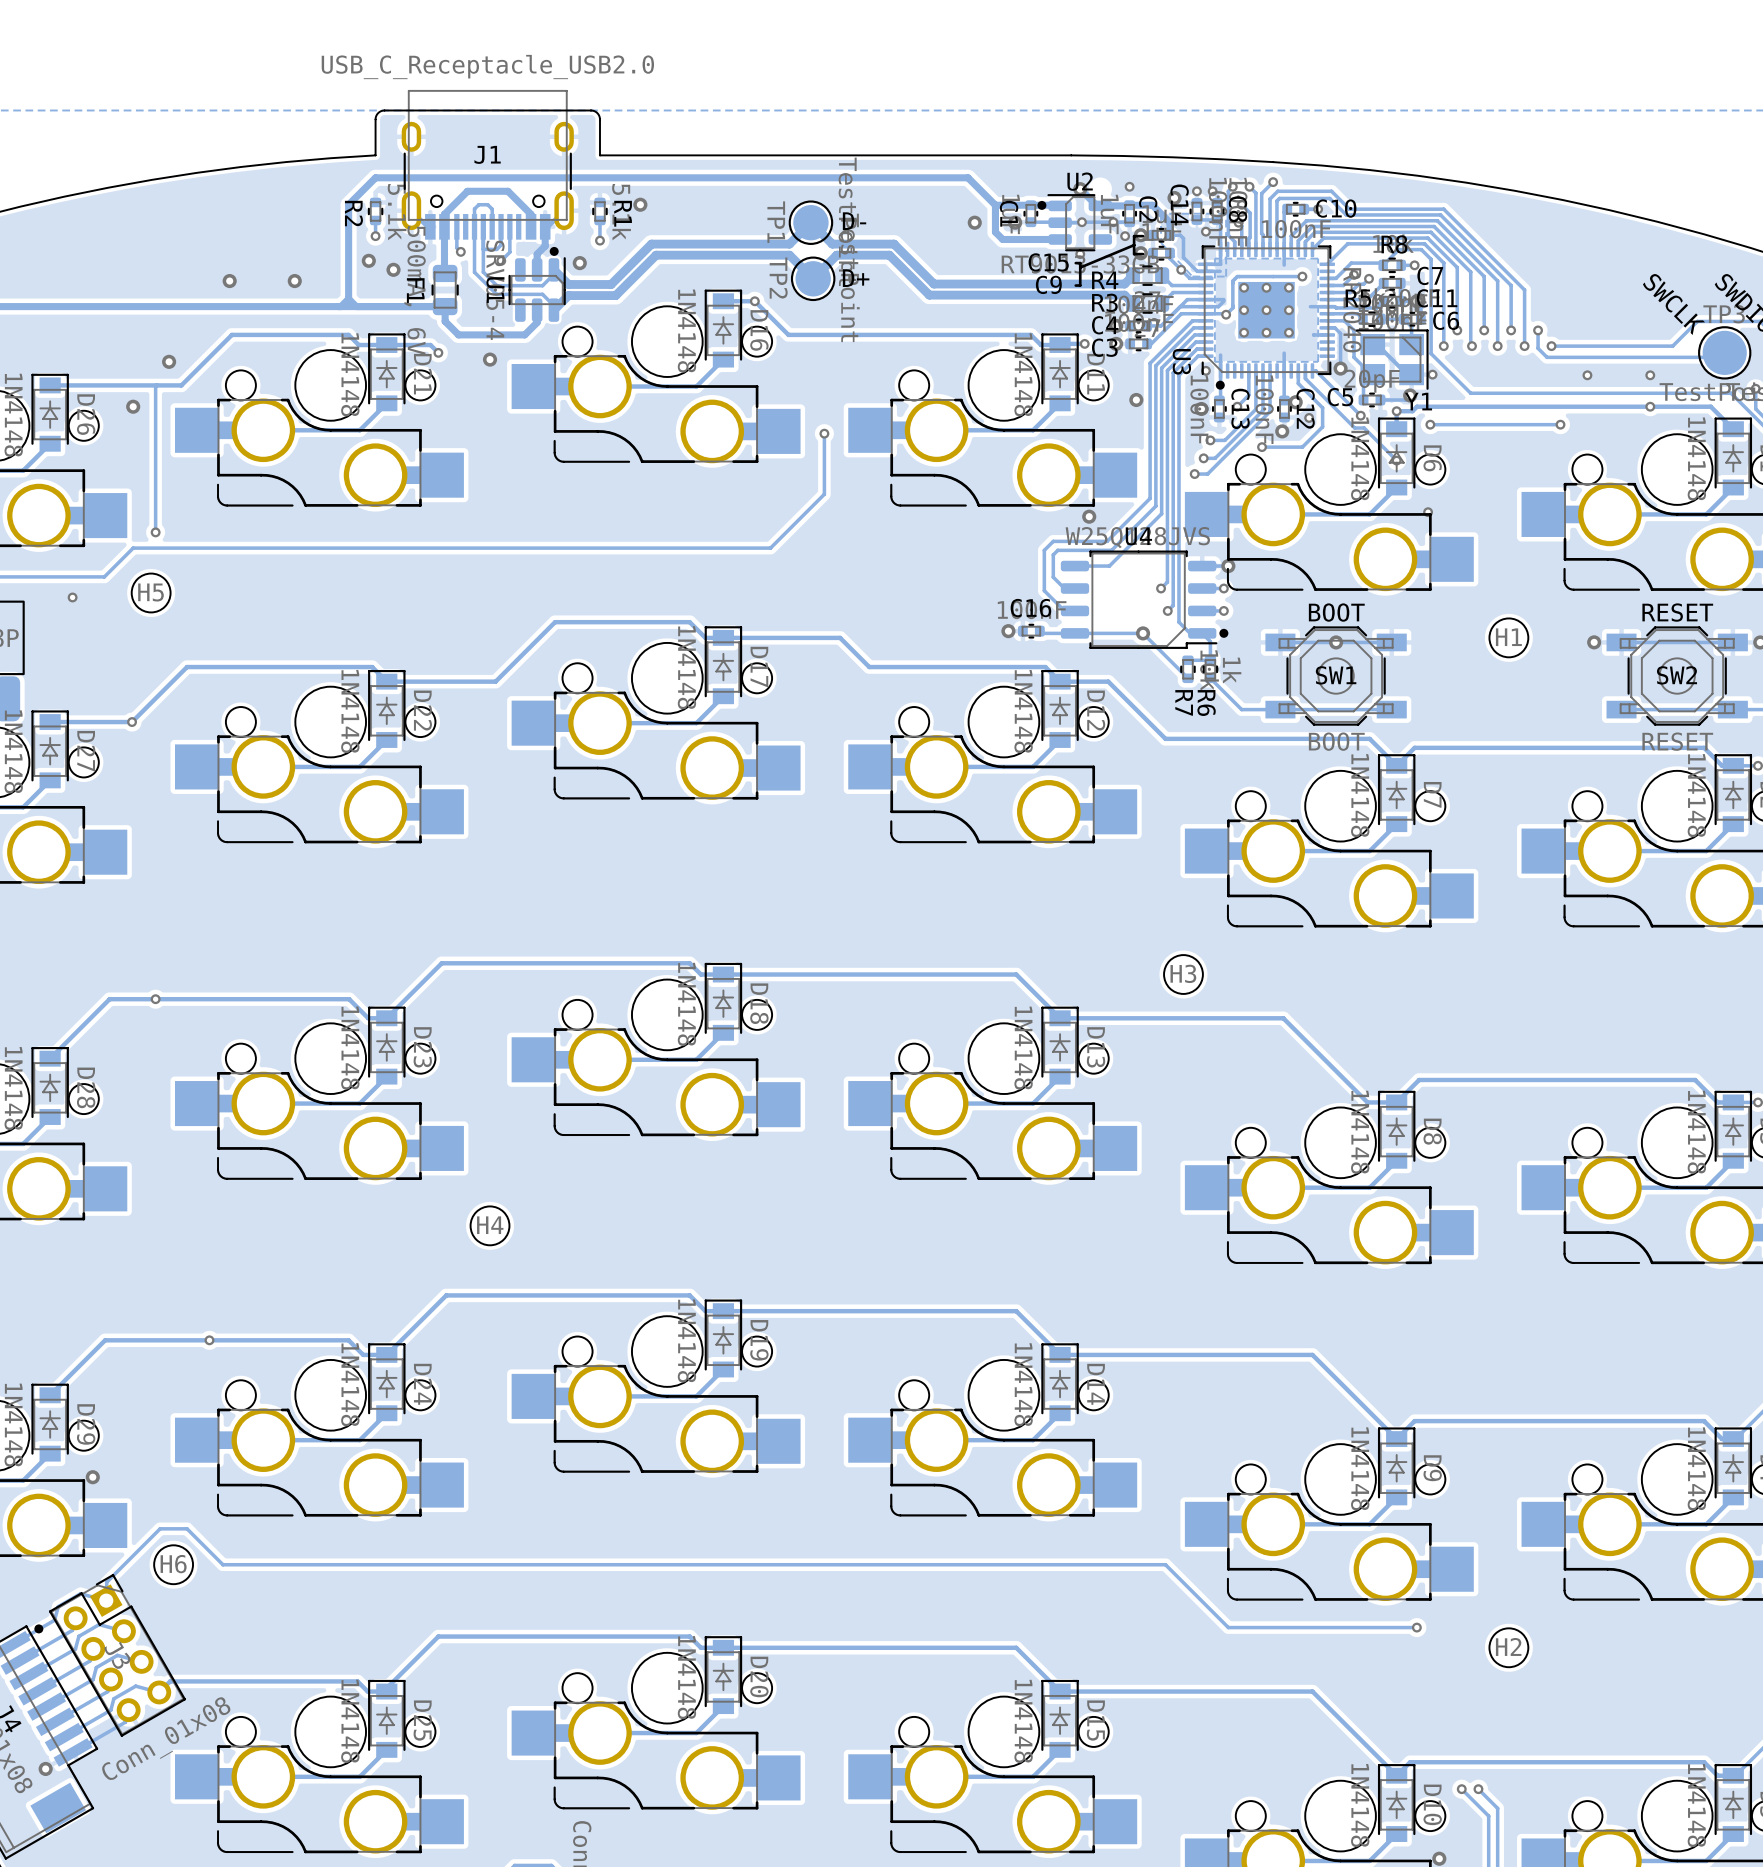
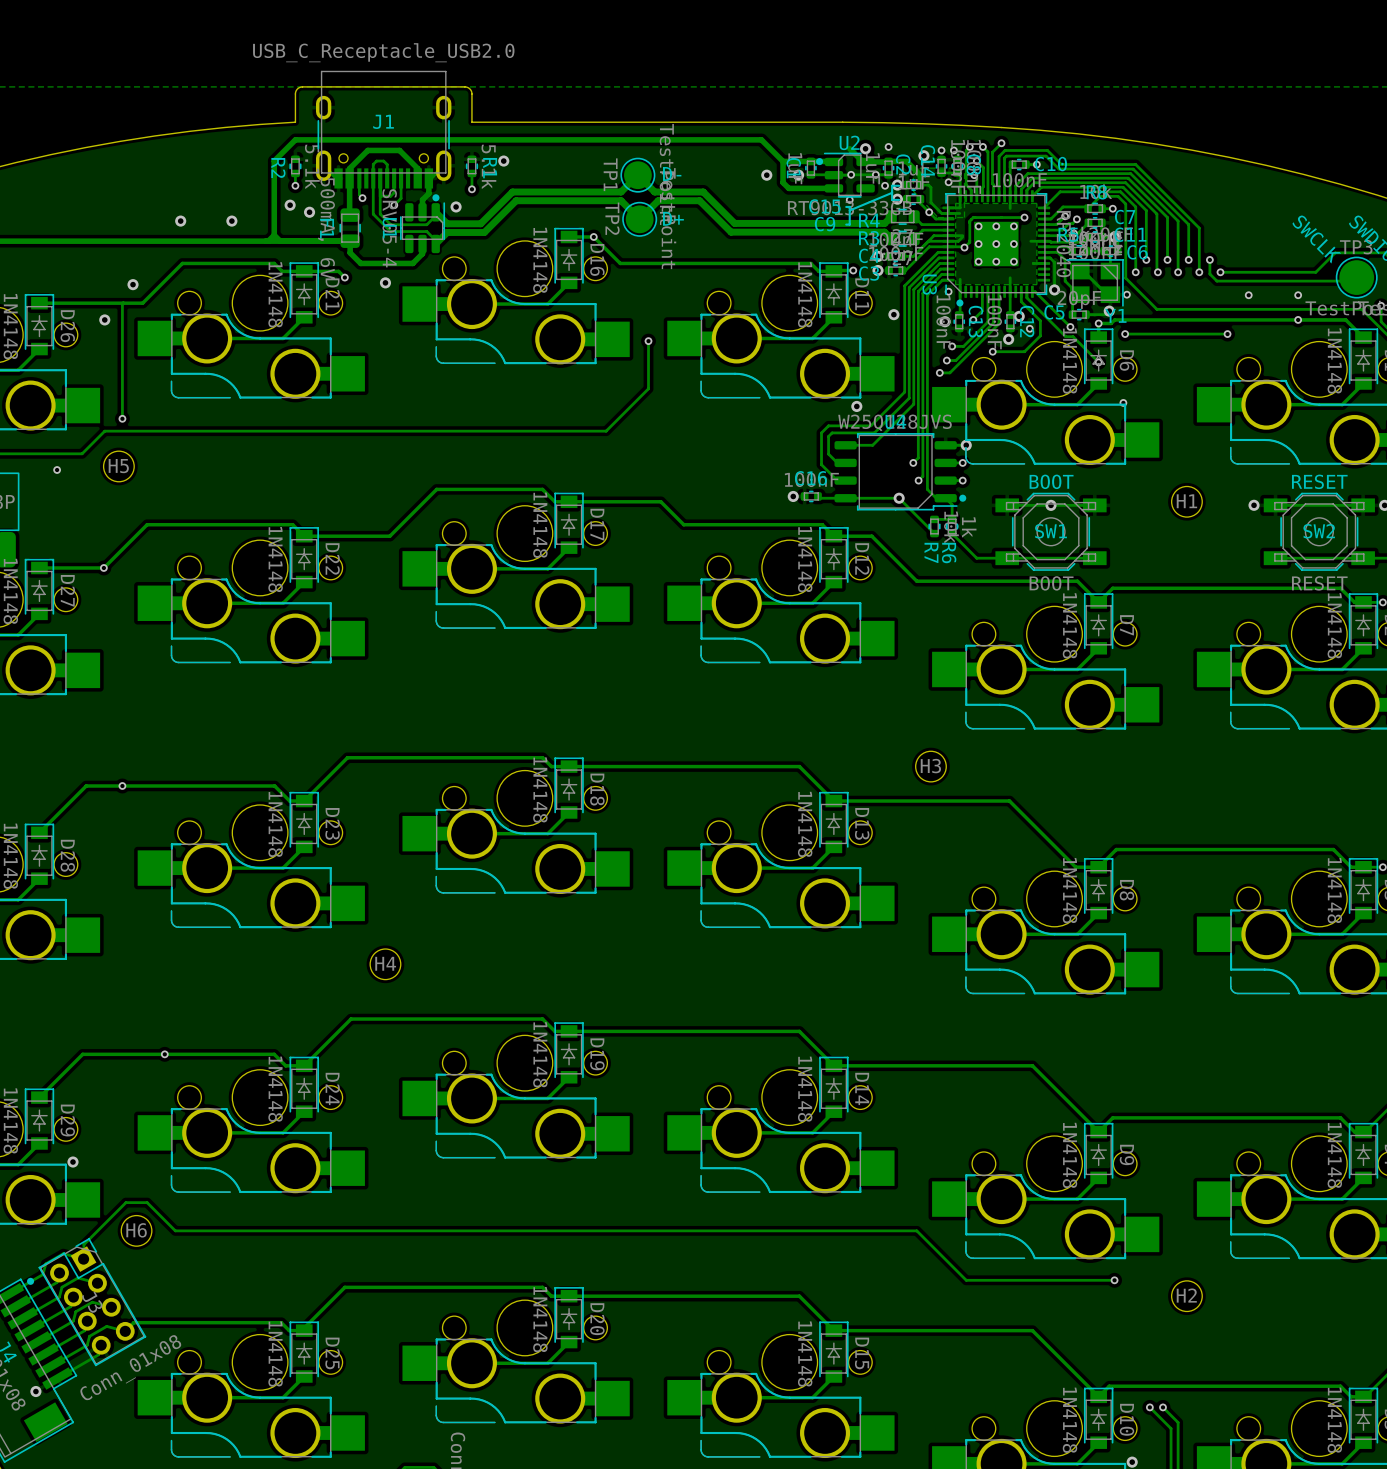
via position: (1080, 189) -> (865, 148)

